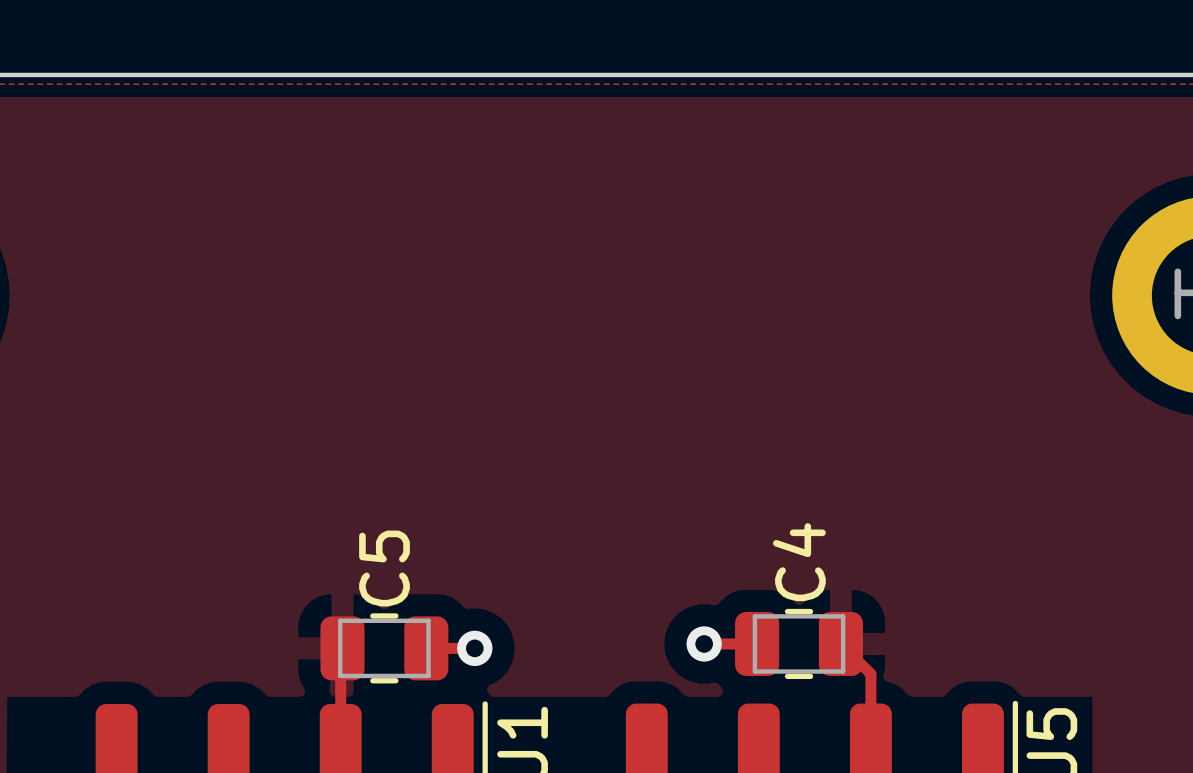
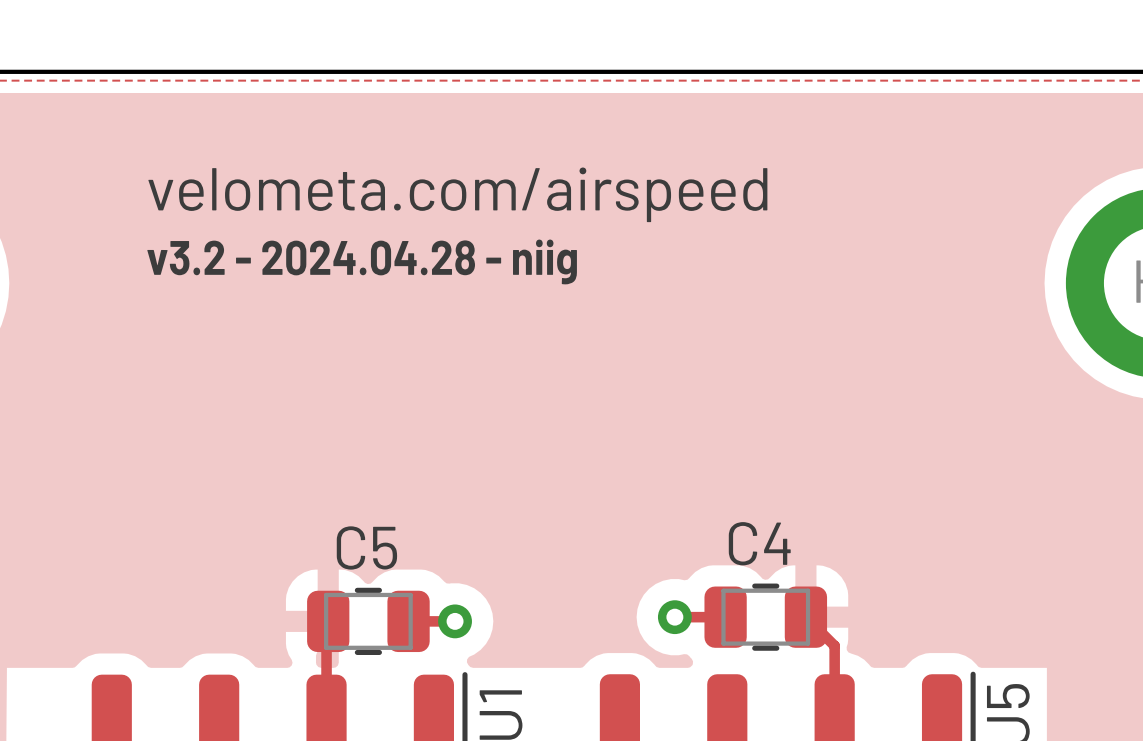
text: none -> velometa.com/airspeed (457, 194)
text: none -> v3.2 - 2024.04.28 - niig (362, 261)
C4 name rotation: 0° (799, 562) -> 90° clockwise (759, 543)
C5 name rotation: 0° (384, 568) -> 90° clockwise (366, 547)

